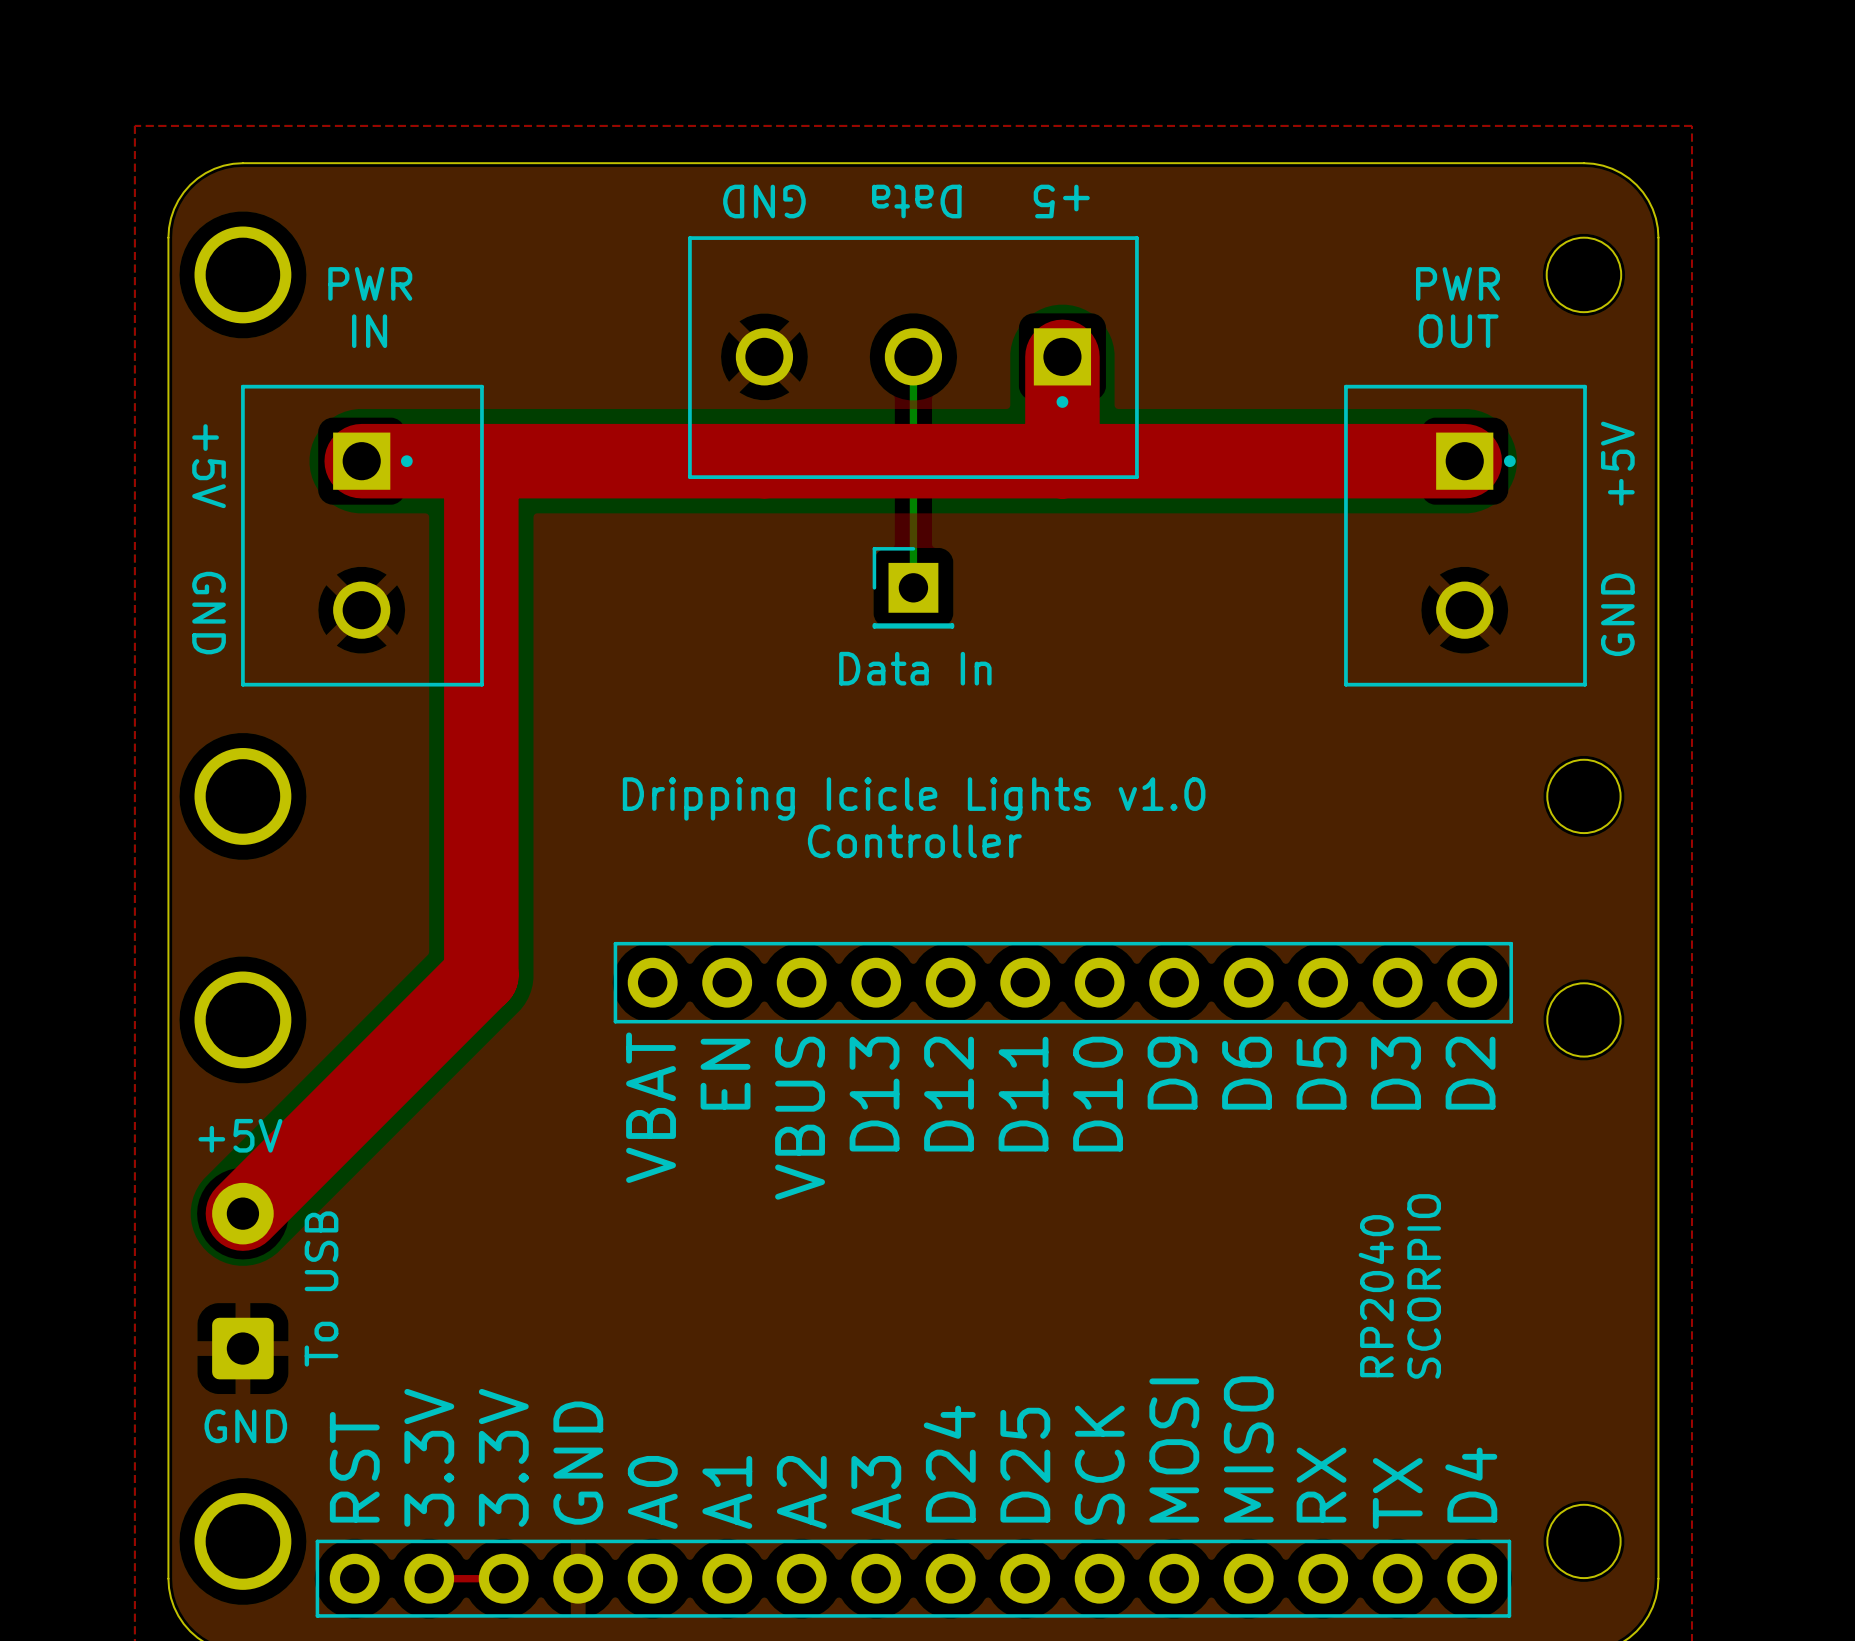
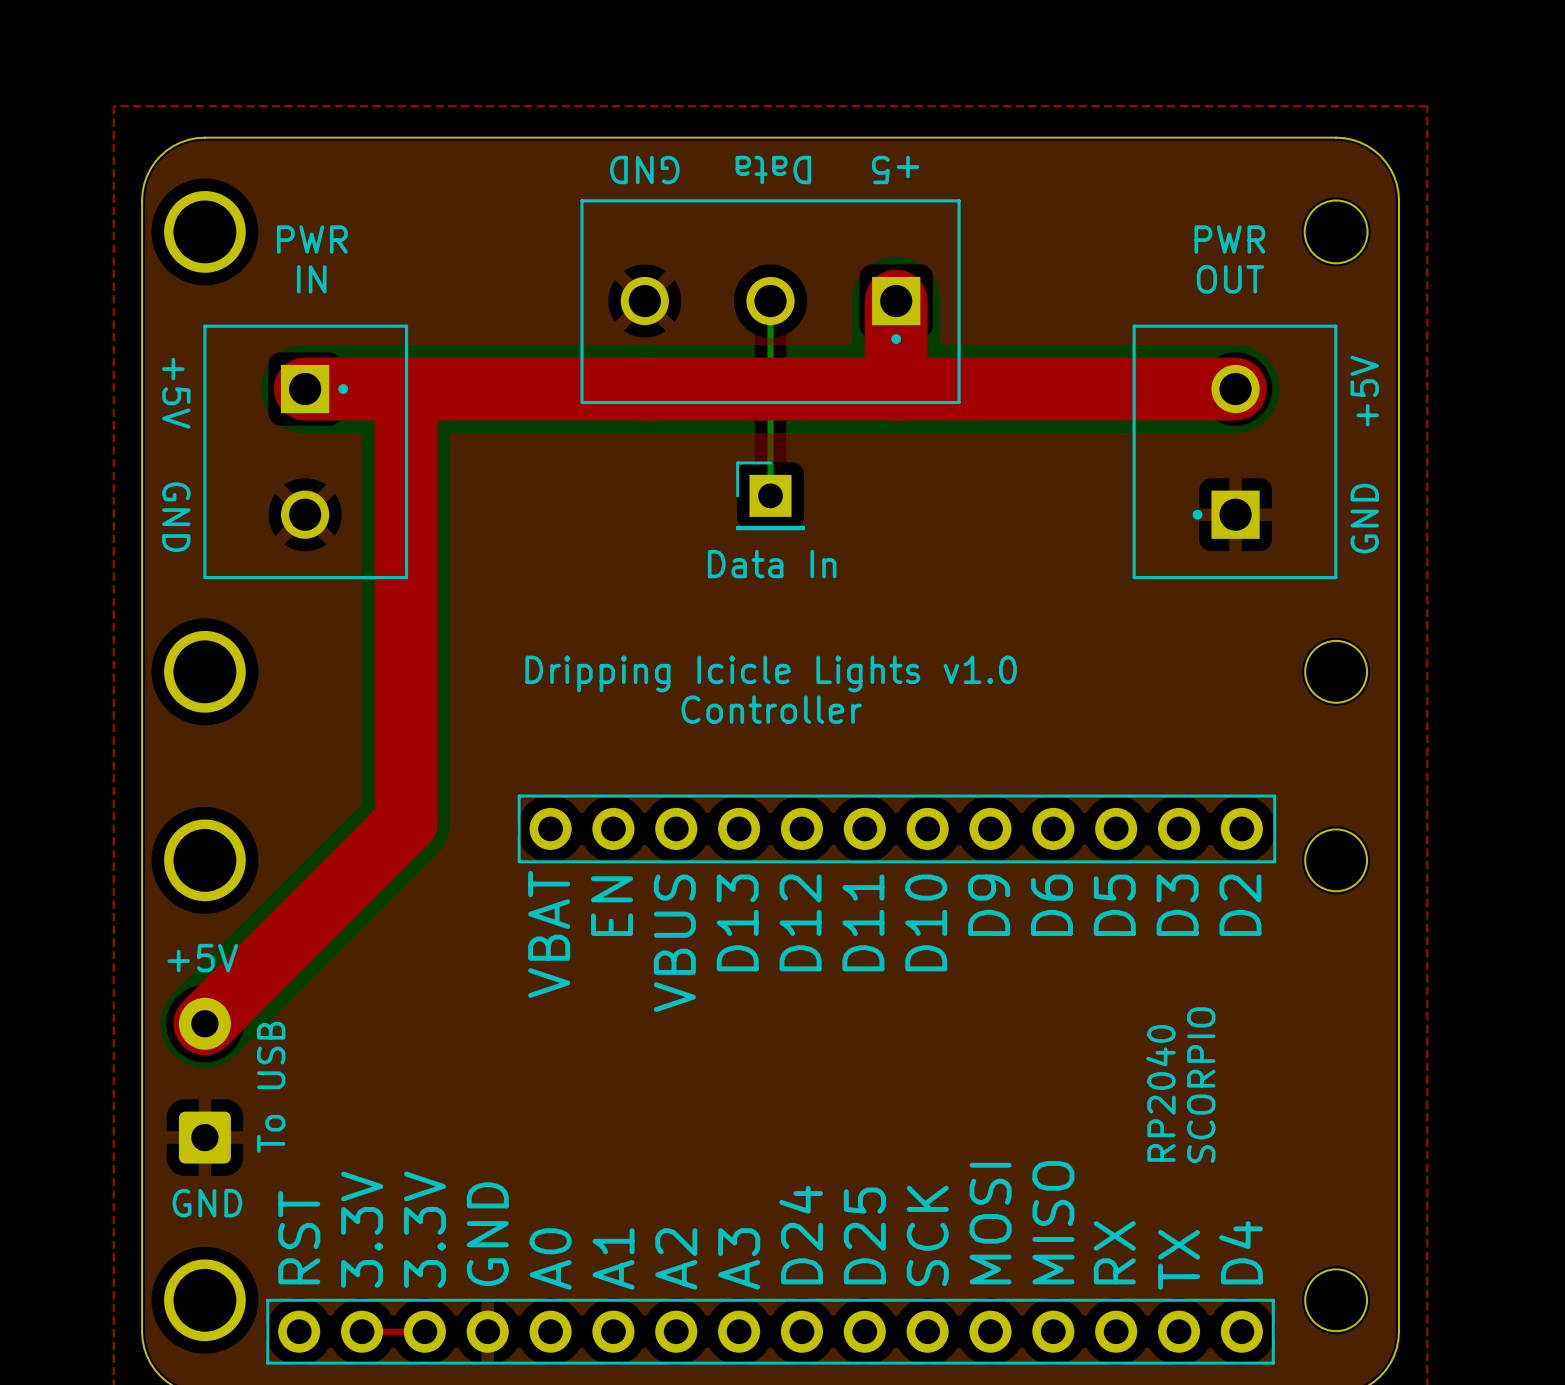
part rotation: 0° (1465, 535) -> 180° (1234, 451)

